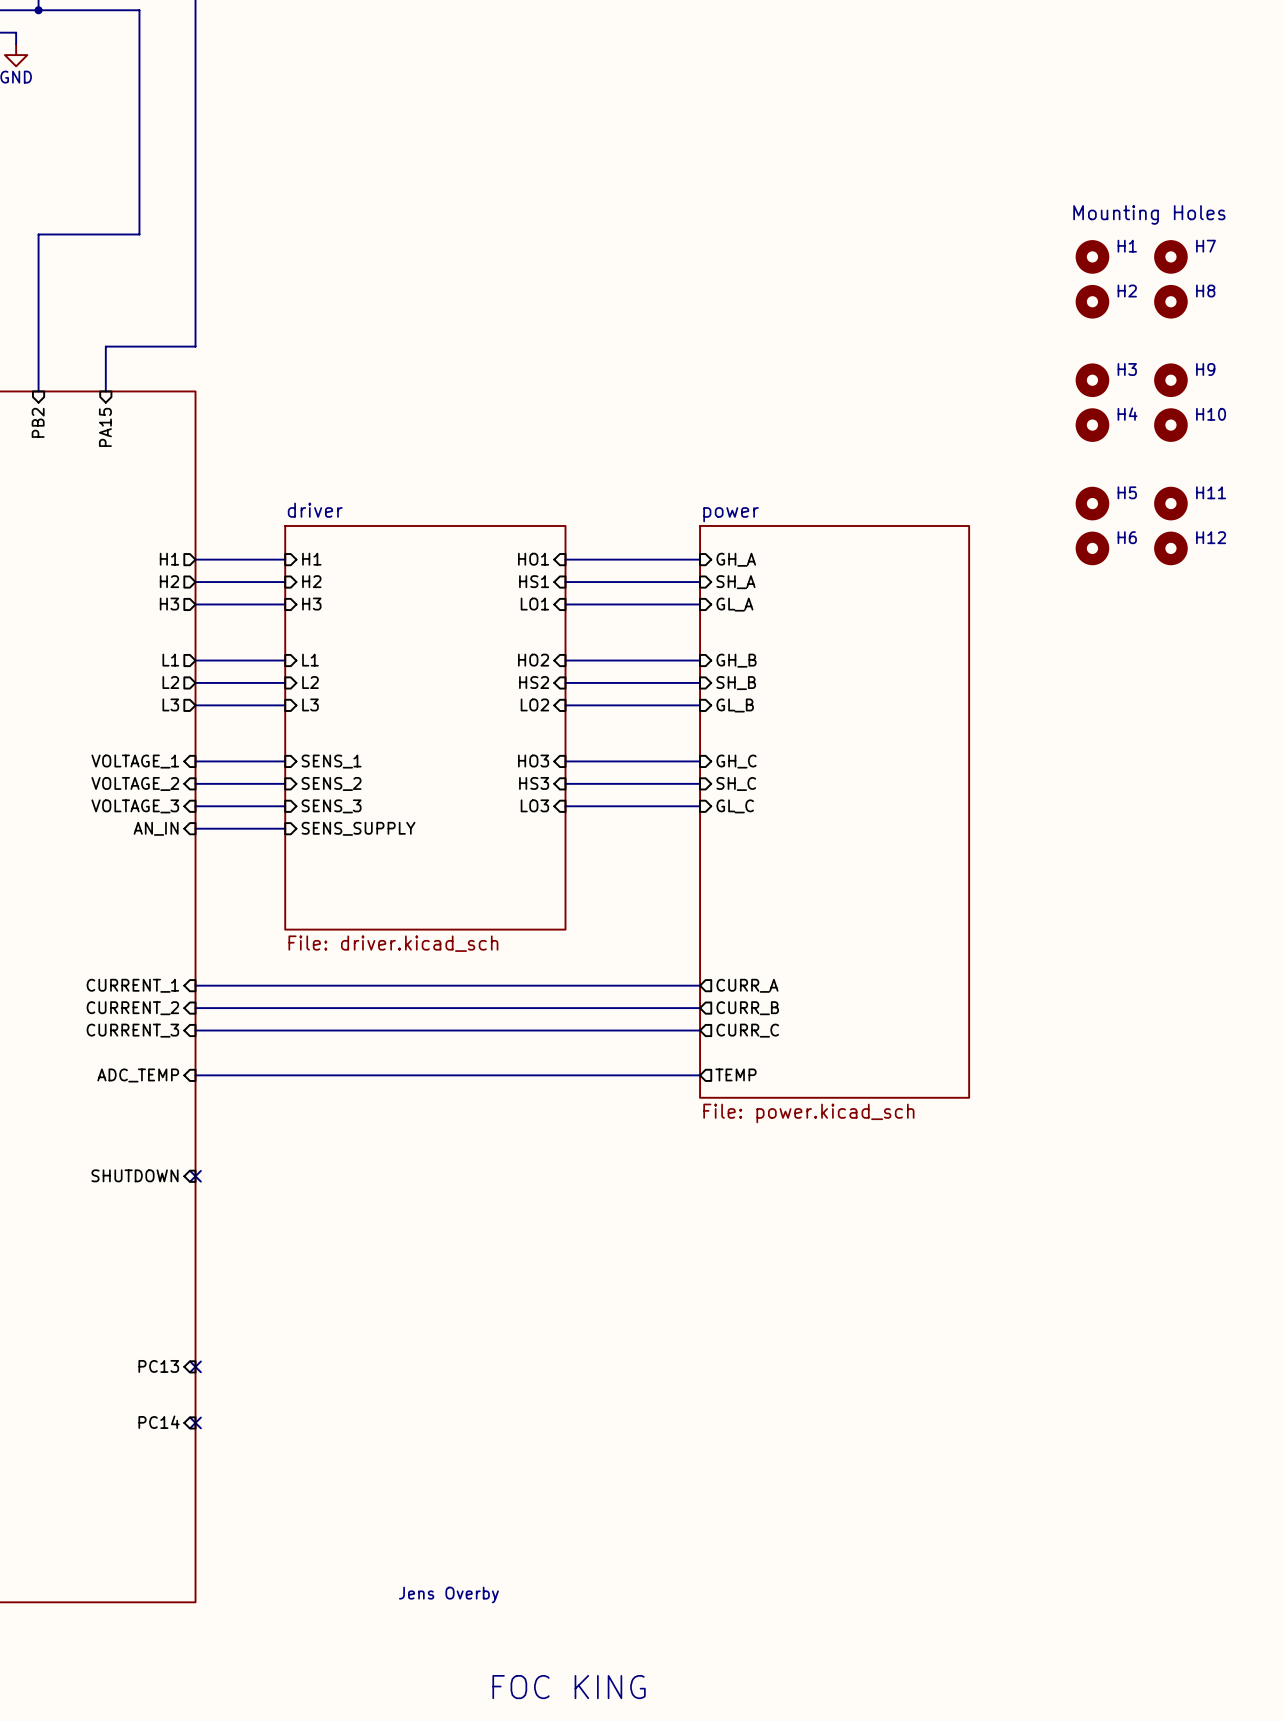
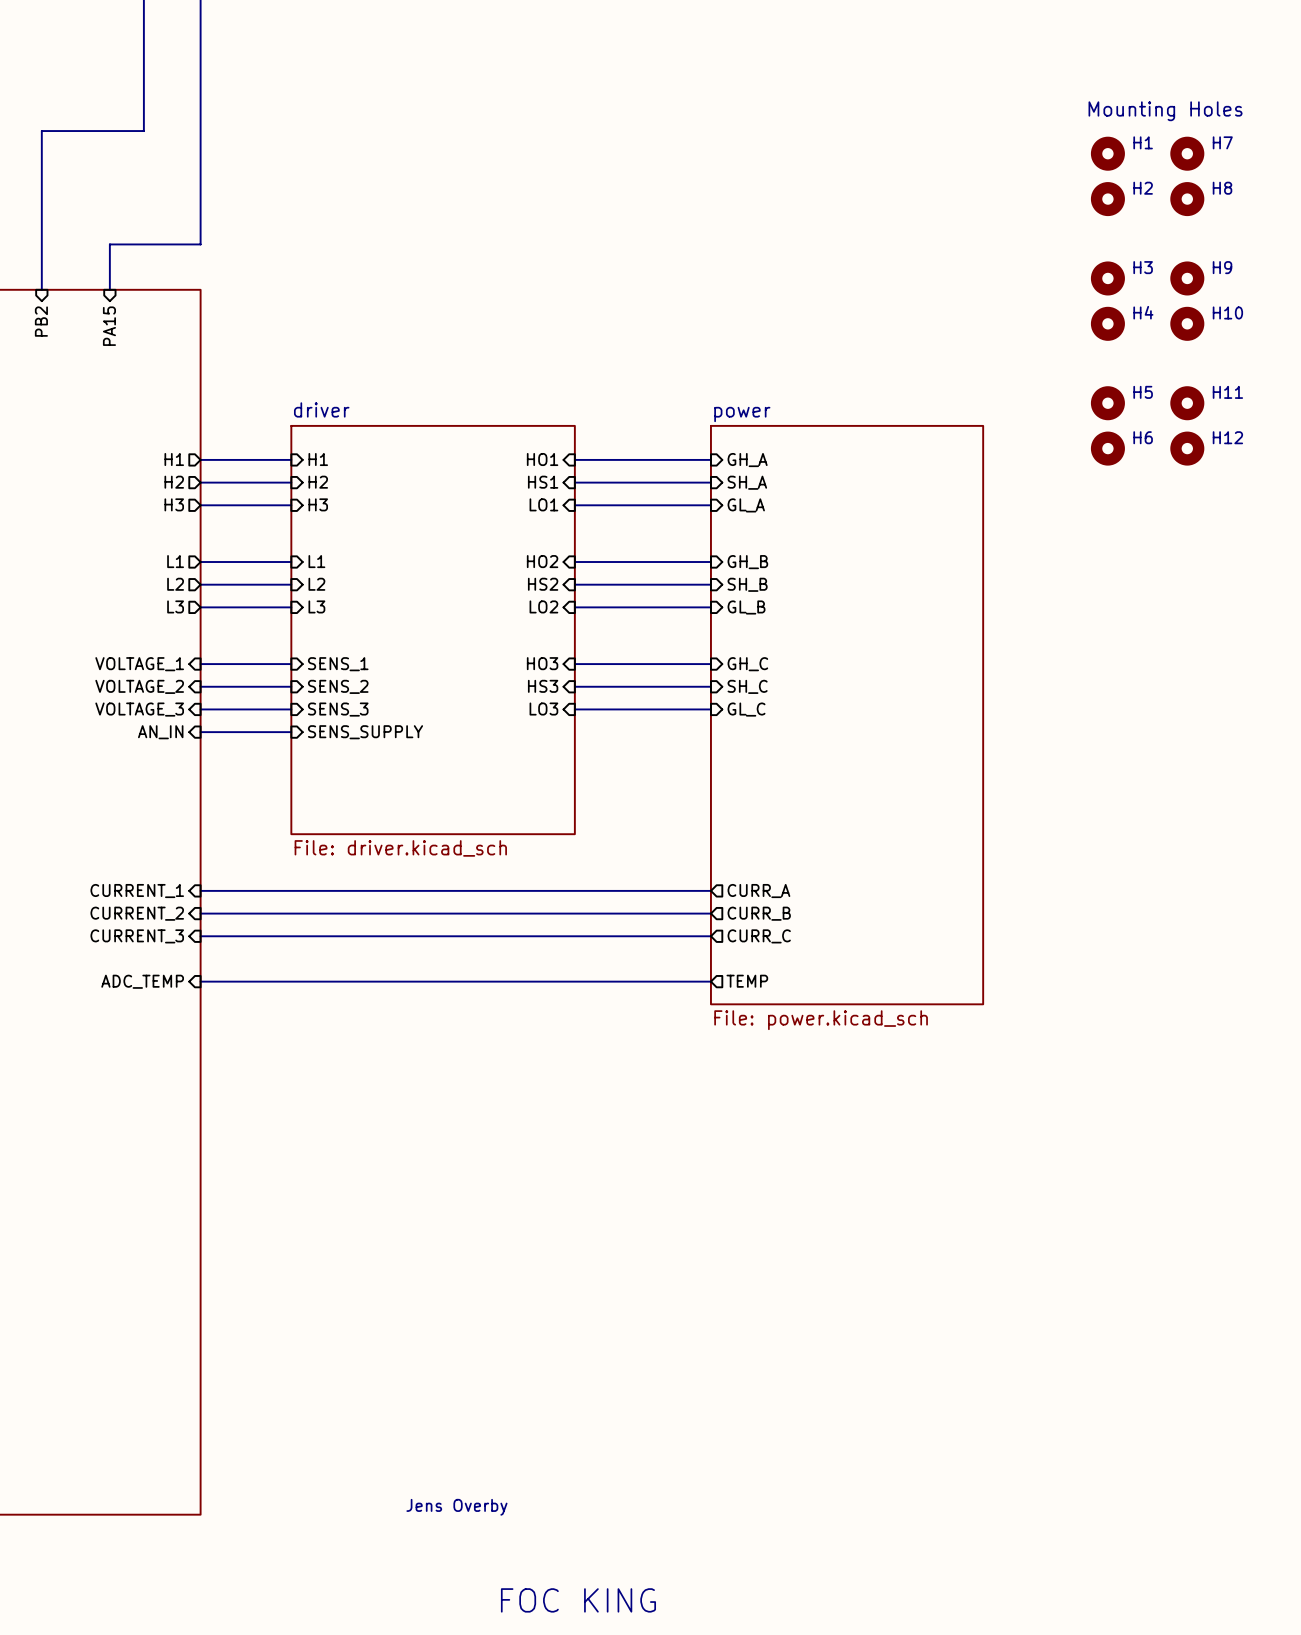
sheet pin: SHUTDOWN (135, 1175) -> none
no-connect mark: (195, 1176) -> none
sheet pin: PC13 (158, 1366) -> none
no-connect mark: (195, 1366) -> none
sheet pin: PC14 (159, 1422) -> none
no-connect mark: (195, 1422) -> none

